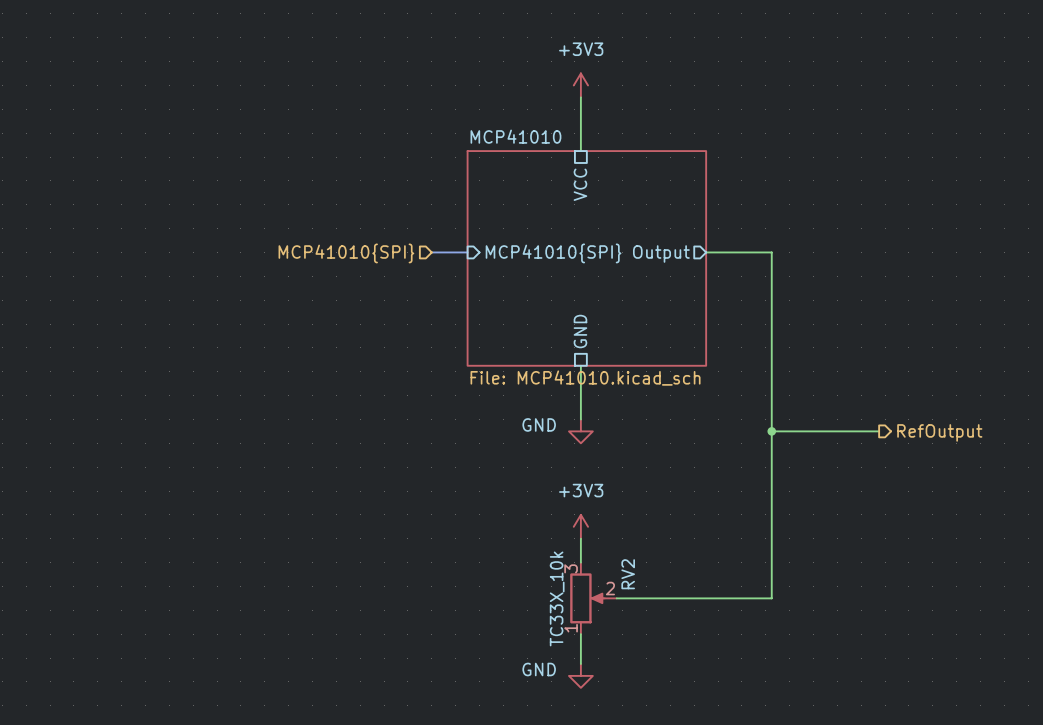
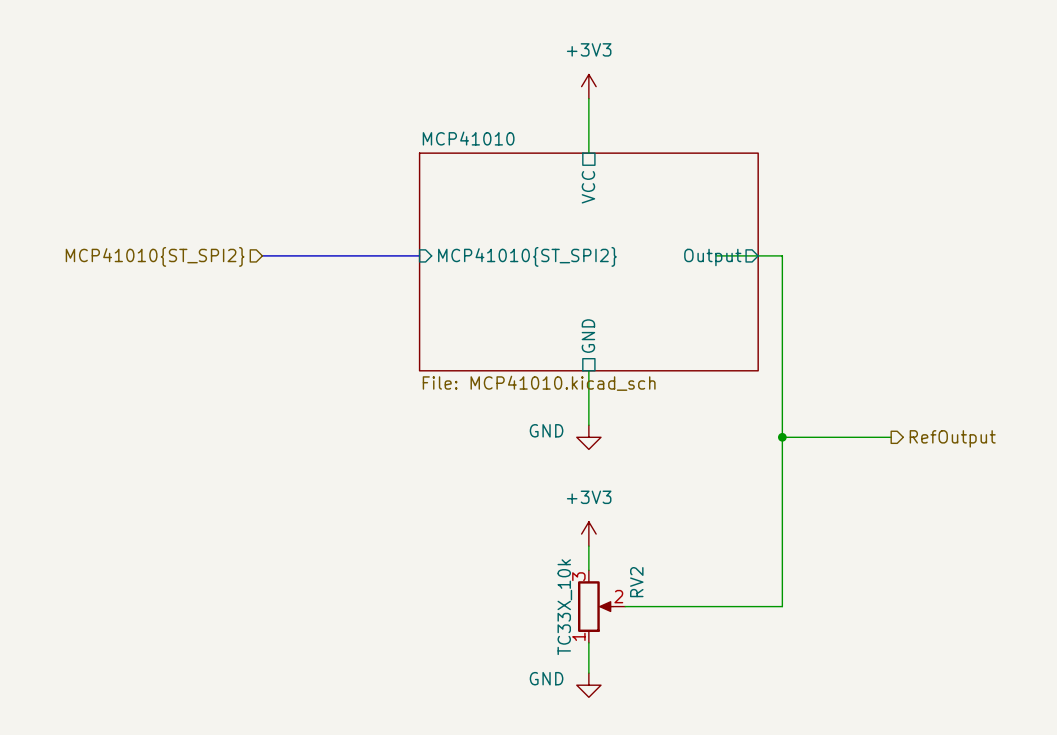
sheet MCP41010 name position: MCP41010 (515, 136) -> MCP41010 (468, 138)
sheet MCP41010 shape: [466, 150, 707, 367] -> [418, 152, 759, 372]
bus: none -> (262, 255) (419, 255)
bus: (431, 252) (467, 252) -> none
hierarchical label: none -> MCP41010{ST_SPI2} (155, 256)
hierarchical label: MCP41010{SPI} (346, 253) -> none
sheet pin: MCP41010{SPI} (553, 253) -> MCP41010{ST_SPI2} (527, 256)
sheet pin position: Output (661, 253) -> Output (712, 257)
sheet MCP41010 value position: File: MCP41010.kicad_sch (585, 378) -> File: MCP41010.kicad_sch (539, 383)

